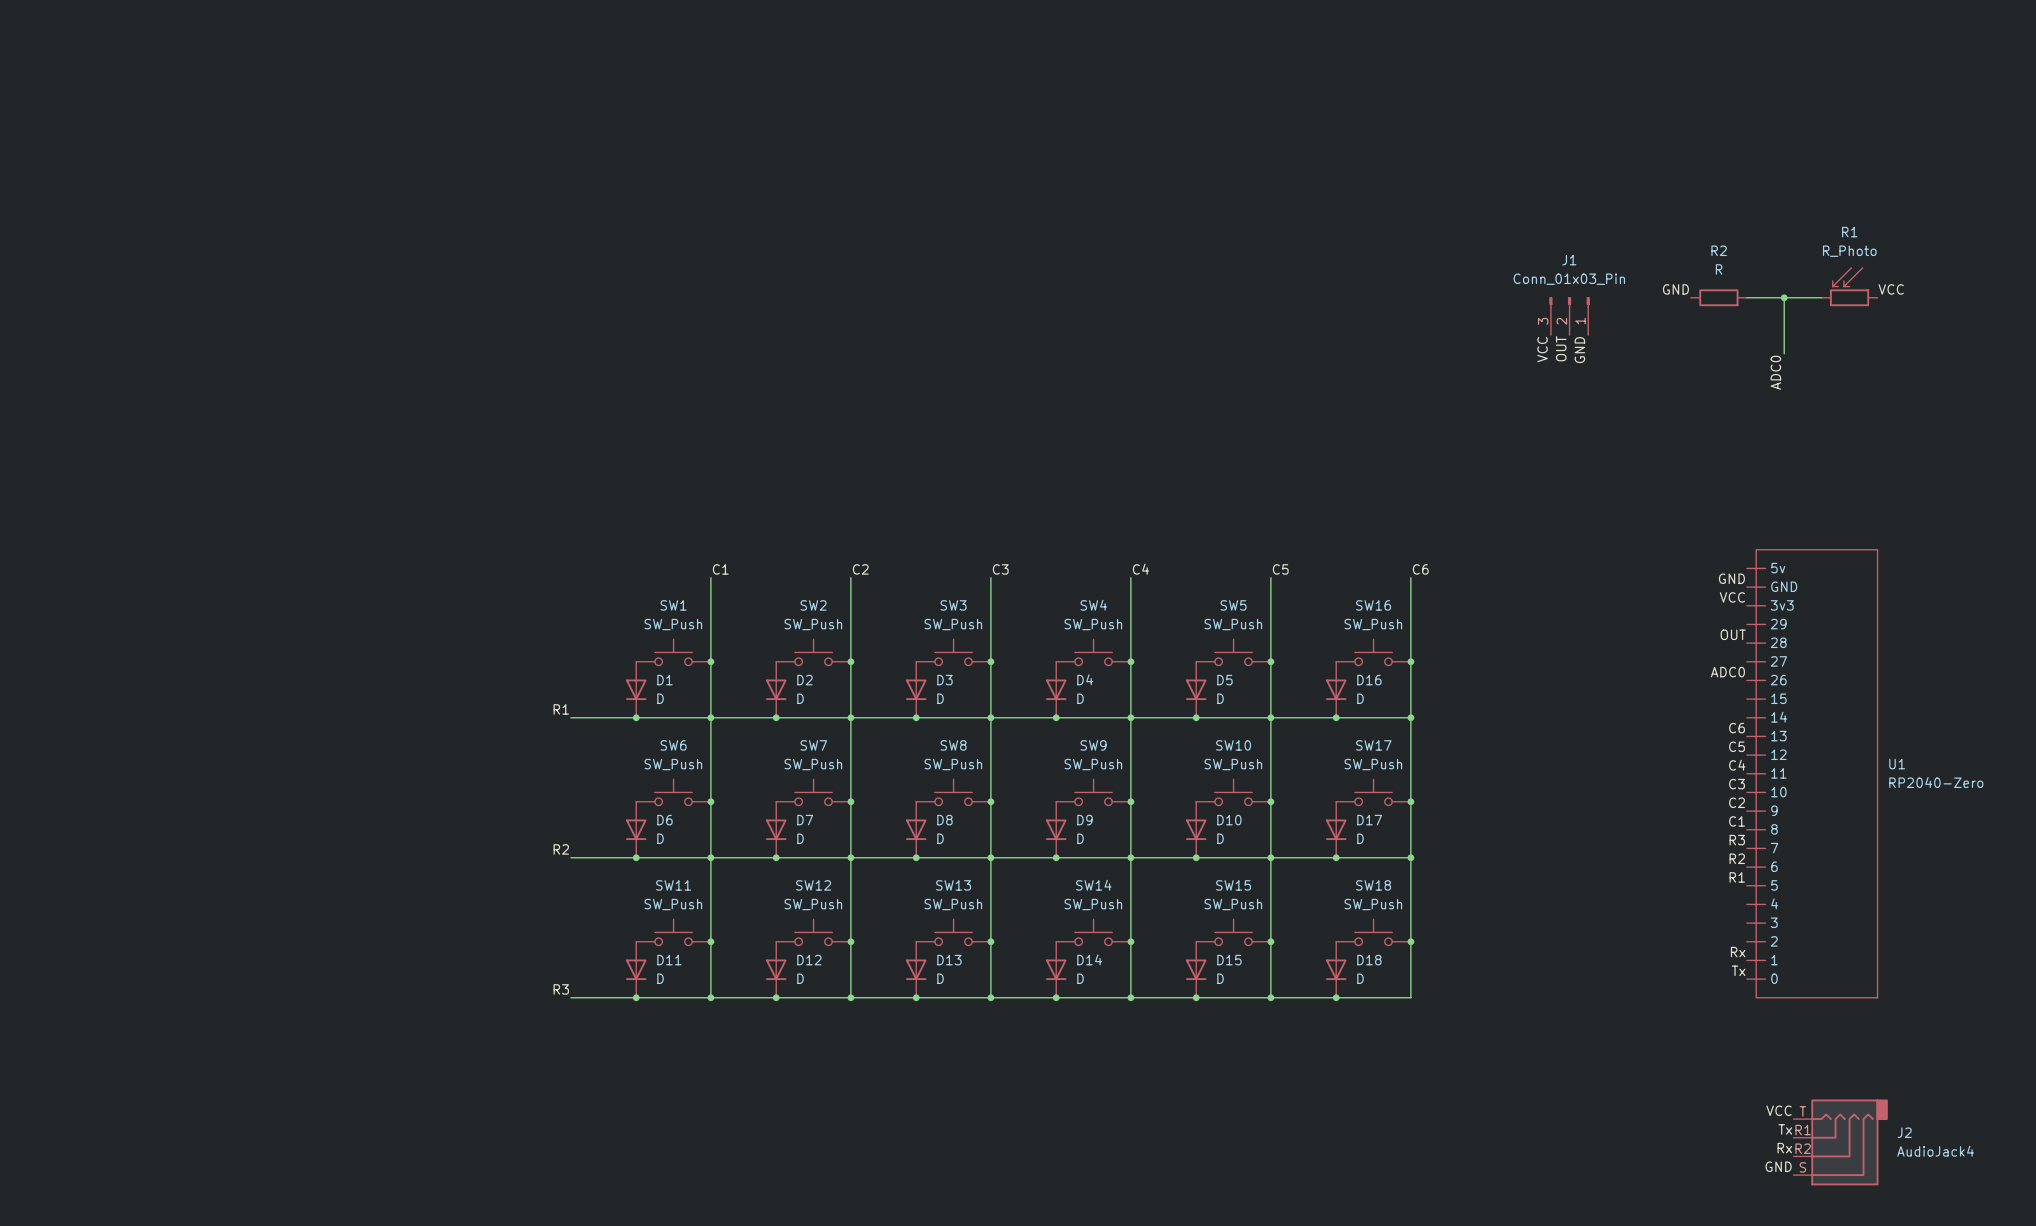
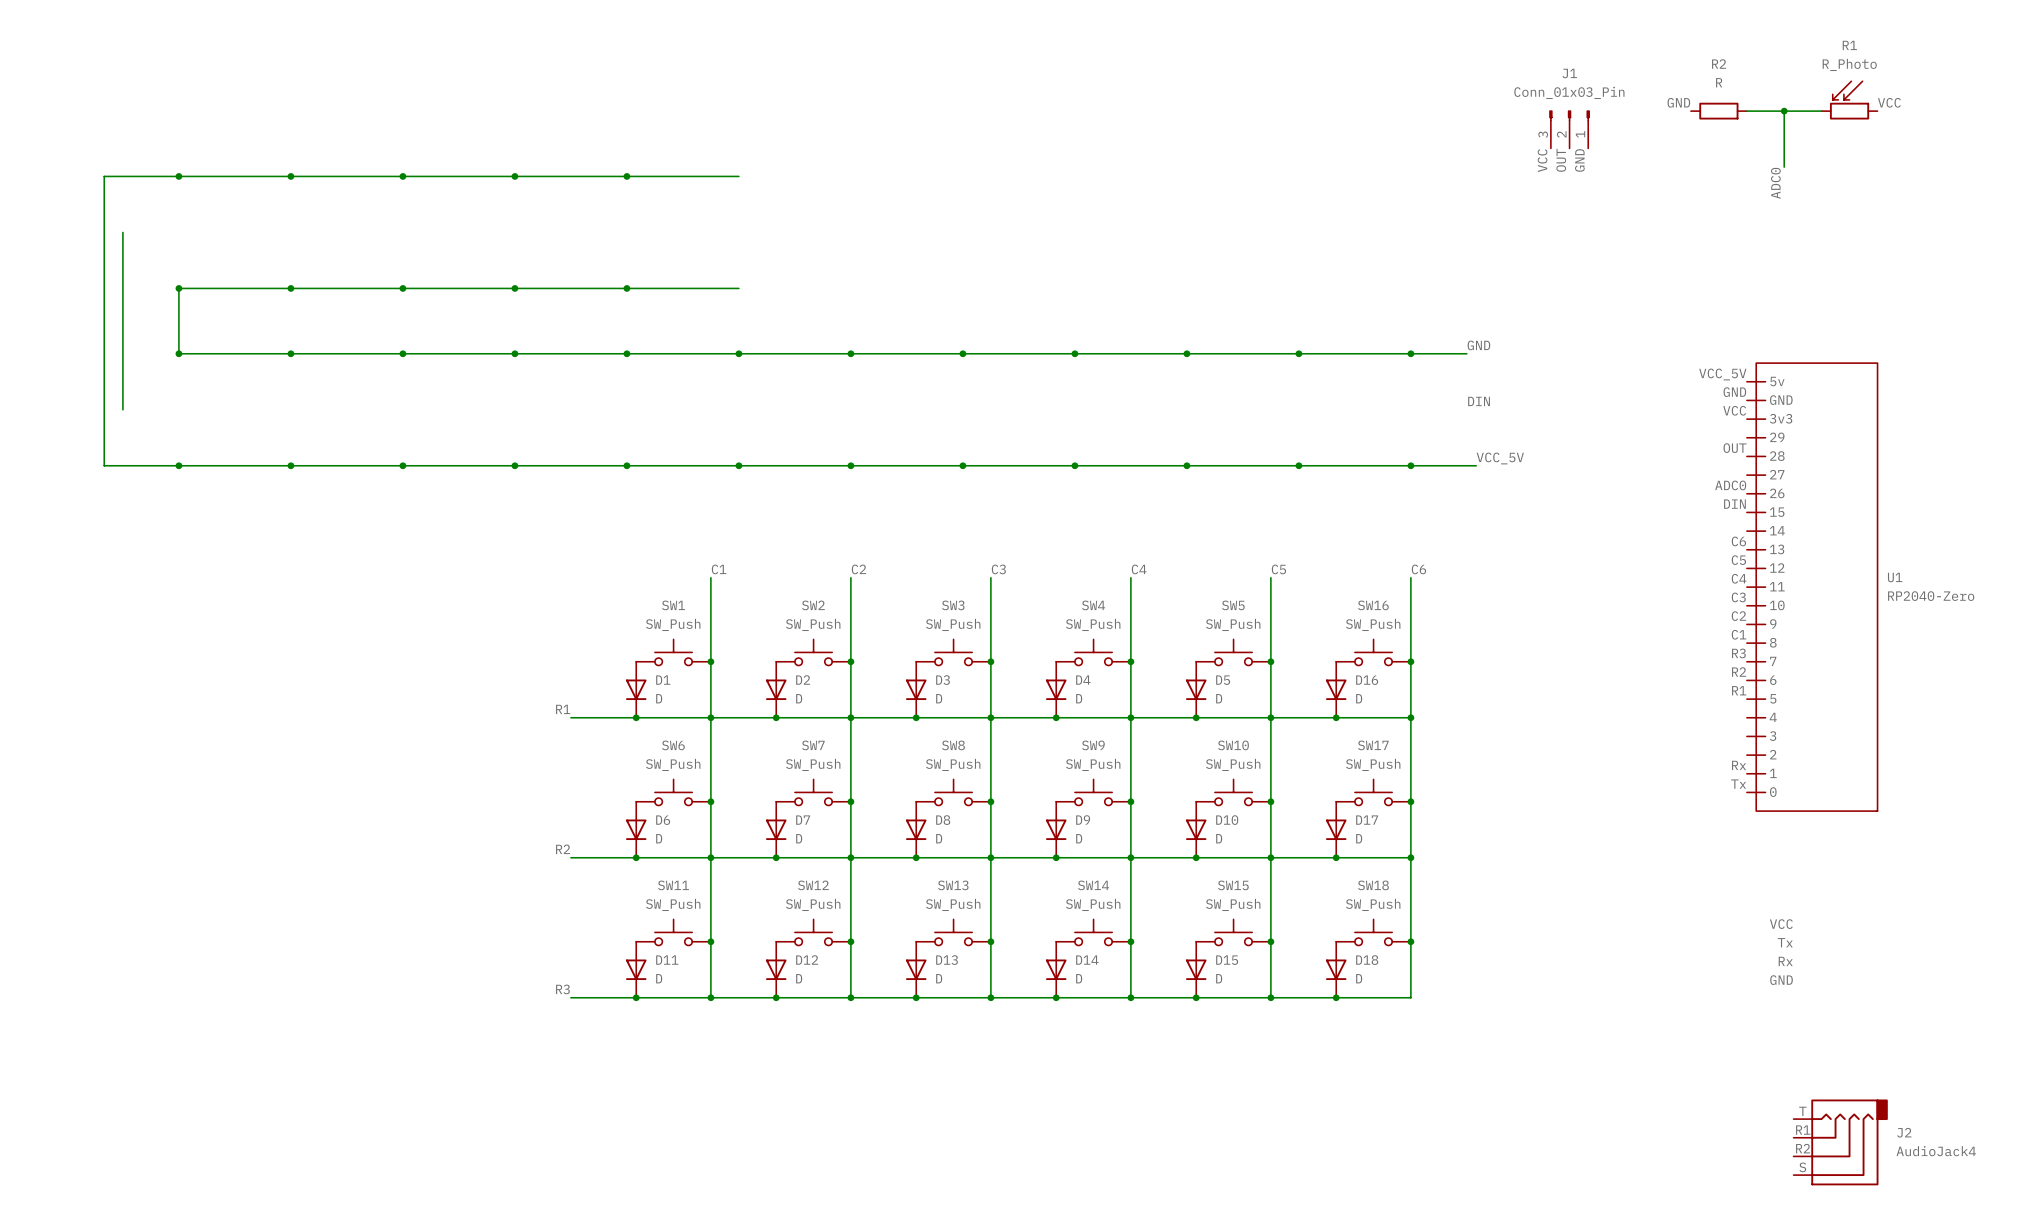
label: none -> GND (1678, 102)
label: none -> VCC (1889, 102)
wire: none -> (1746, 111) (1821, 111)
wire: none -> (1784, 111) (1784, 167)
junction: none -> (1784, 111)
label: none -> VCC (1542, 160)
label: none -> OUT (1561, 160)
label: none -> GND (1579, 160)
junction: none -> (178, 176)
junction: none -> (290, 176)
junction: none -> (402, 176)
junction: none -> (514, 176)
junction: none -> (626, 176)
wire: none -> (738, 176) (104, 176) (104, 465) (1476, 465)
label: none -> ADC0 (1775, 183)
wire: none -> (122, 232) (122, 409)
R1 position: (1849, 287) -> (1849, 100)
junction: none -> (178, 288)
junction: none -> (290, 288)
junction: none -> (402, 288)
junction: none -> (514, 288)
junction: none -> (626, 288)
wire: none -> (738, 288) (178, 288) (178, 353) (1466, 353)
label: GND (1675, 289) -> none
label: VCC (1891, 289) -> none
R2 position: (1718, 297) -> (1718, 111)
wire: (1746, 297) (1821, 297) -> none
wire: (1784, 297) (1784, 353) -> none
junction: (1784, 297) -> none
J1 position: (1569, 316) -> (1569, 129)
label: none -> GND (1478, 345)
label: OUT (1561, 348) -> none
label: VCC (1542, 349) -> none
label: GND (1579, 350) -> none
junction: none -> (178, 353)
junction: none -> (290, 353)
junction: none -> (402, 353)
junction: none -> (514, 353)
junction: none -> (626, 353)
junction: none -> (738, 353)
junction: none -> (850, 353)
junction: none -> (962, 353)
junction: none -> (1074, 353)
junction: none -> (1186, 353)
junction: none -> (1298, 353)
junction: none -> (1410, 353)
label: ADC0 (1775, 372) -> none
label: none -> VCC_5V (1722, 374)
label: none -> GND (1734, 392)
label: none -> DIN (1479, 401)
label: none -> VCC (1734, 410)
label: none -> OUT (1735, 448)
label: none -> VCC_5V (1500, 458)
junction: none -> (178, 465)
junction: none -> (290, 465)
junction: none -> (402, 465)
junction: none -> (514, 465)
junction: none -> (626, 465)
junction: none -> (738, 465)
junction: none -> (850, 465)
junction: none -> (962, 465)
junction: none -> (1074, 465)
junction: none -> (1186, 465)
junction: none -> (1298, 465)
junction: none -> (1410, 465)
label: none -> ADC0 (1730, 485)
label: none -> DIN (1734, 504)
label: none -> C6 (1738, 541)
label: none -> C5 (1738, 560)
label: GND (1731, 578) -> C4 (1739, 578)
label: VCC (1732, 597) -> C3 (1738, 597)
label: none -> C2 (1738, 616)
label: OUT (1733, 634) -> C1 (1739, 634)
label: none -> R3 (1738, 653)
label: ADC0 (1727, 672) -> R2 (1739, 672)
label: none -> R1 (1739, 690)
label: C6 (1737, 728) -> none
label: C5 (1737, 746) -> none
label: C4 (1737, 765) -> Rx (1739, 765)
U1 position: (1812, 773) -> (1812, 587)
label: C3 (1737, 784) -> Tx (1738, 784)
label: C2 (1737, 802) -> none
label: C1 (1737, 821) -> none
label: R3 (1737, 840) -> none
label: R2 (1737, 858) -> none
label: R1 (1737, 877) -> none
label: none -> VCC (1781, 924)
label position: Rx (1738, 952) -> Rx (1785, 961)
label position: Tx (1738, 970) -> Tx (1785, 942)
label: none -> GND (1781, 980)
label: VCC (1779, 1110) -> none
label: Tx (1785, 1129) -> none
label: Rx (1784, 1148) -> none
label: GND (1778, 1166) -> none

